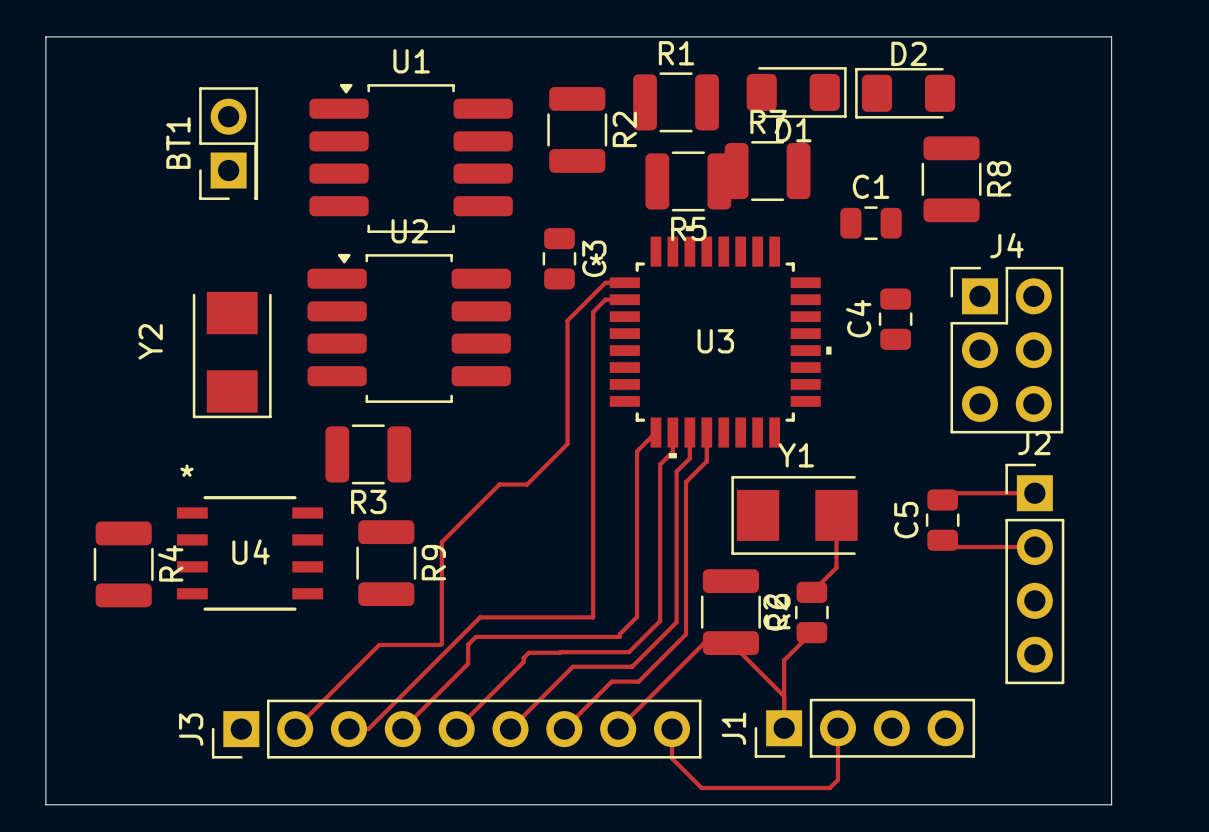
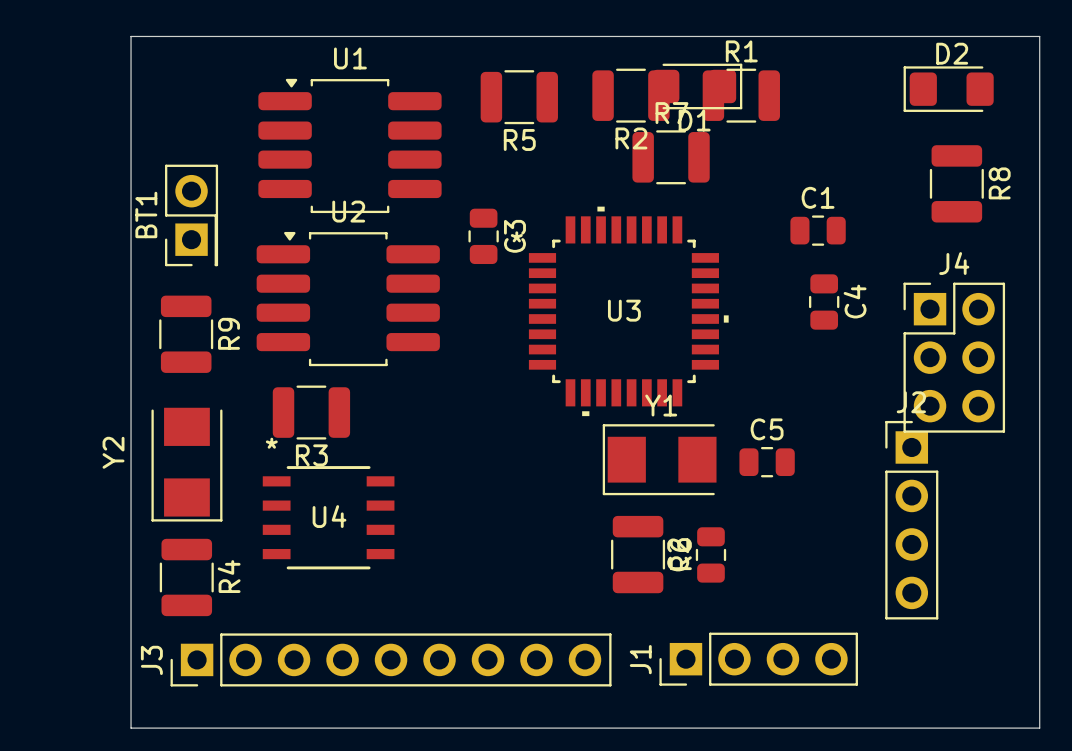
board edge: (168, 36) (45, 36) (45, 804) (168, 804) -> (131, 36) (131, 728)
board edge: (1111, 36) (1111, 804) -> (980, 36) (1039, 36) (1039, 728) (980, 728)
D2 position: (905, 93) -> (948, 89)
R1 position: (676, 102) -> (741, 95)
R2 rotation: 0° (577, 129) -> 90° clockwise (630, 95)
R2 position: (577, 129) -> (630, 95)
BT1 position: (228, 143) -> (191, 215)
R8 position: (951, 179) -> (956, 183)
R5 position: (688, 181) -> (519, 97)
C1 position: (871, 223) -> (818, 230)
top track: (624, 282) (605, 282) (567, 320) (567, 444) (527, 484) (499, 484) (441, 542) (441, 643) (379, 644) (295, 729) -> none
top track: (624, 299) (605, 299) (593, 312) (593, 617) -> none
C4 name position: C4 (858, 318) -> C4 (855, 301)
C4 position: (895, 319) -> (824, 302)
J4 position: (1006, 350) -> (954, 357)
Y2 position: (232, 355) -> (186, 464)
top track: (655, 432) (637, 451) (637, 616) (619, 634) (619, 636) (475, 636) (468, 644) (468, 663) (402, 729) -> none
top track: (672, 432) (672, 451) (660, 464) (660, 621) (628, 652) (528, 652) (523, 658) (523, 662) (456, 729) -> none
top track: (689, 432) (689, 458) (676, 471) (676, 622) (632, 666) (572, 666) (510, 729) -> none
top track: (706, 432) (706, 461) (686, 482) (686, 634) (638, 681) (611, 681) (564, 729) -> none
top track: (1034, 493) (949, 493) (942, 499) -> none
Y1 position: (794, 515) -> (659, 459)
top track: (836, 515) (836, 567) (811, 592) -> none
C5 rotation: 0° (942, 520) -> 90° clockwise (767, 462)
C5 position: (942, 520) -> (767, 462)
top track: (942, 540) (949, 547) (1034, 547) -> none
U4 position: (250, 553) -> (328, 517)
R9 position: (386, 563) -> (186, 334)
R4 position: (123, 564) -> (186, 577)
top track: (592, 617) (480, 617) (368, 729) (349, 729) -> none
top track: (811, 632) (784, 660) (784, 728) -> none
top track: (784, 696) (730, 643) (704, 643) (618, 729) -> none
top track: (837, 728) (837, 779) (829, 788) (701, 788) (672, 758) (672, 729) -> none

